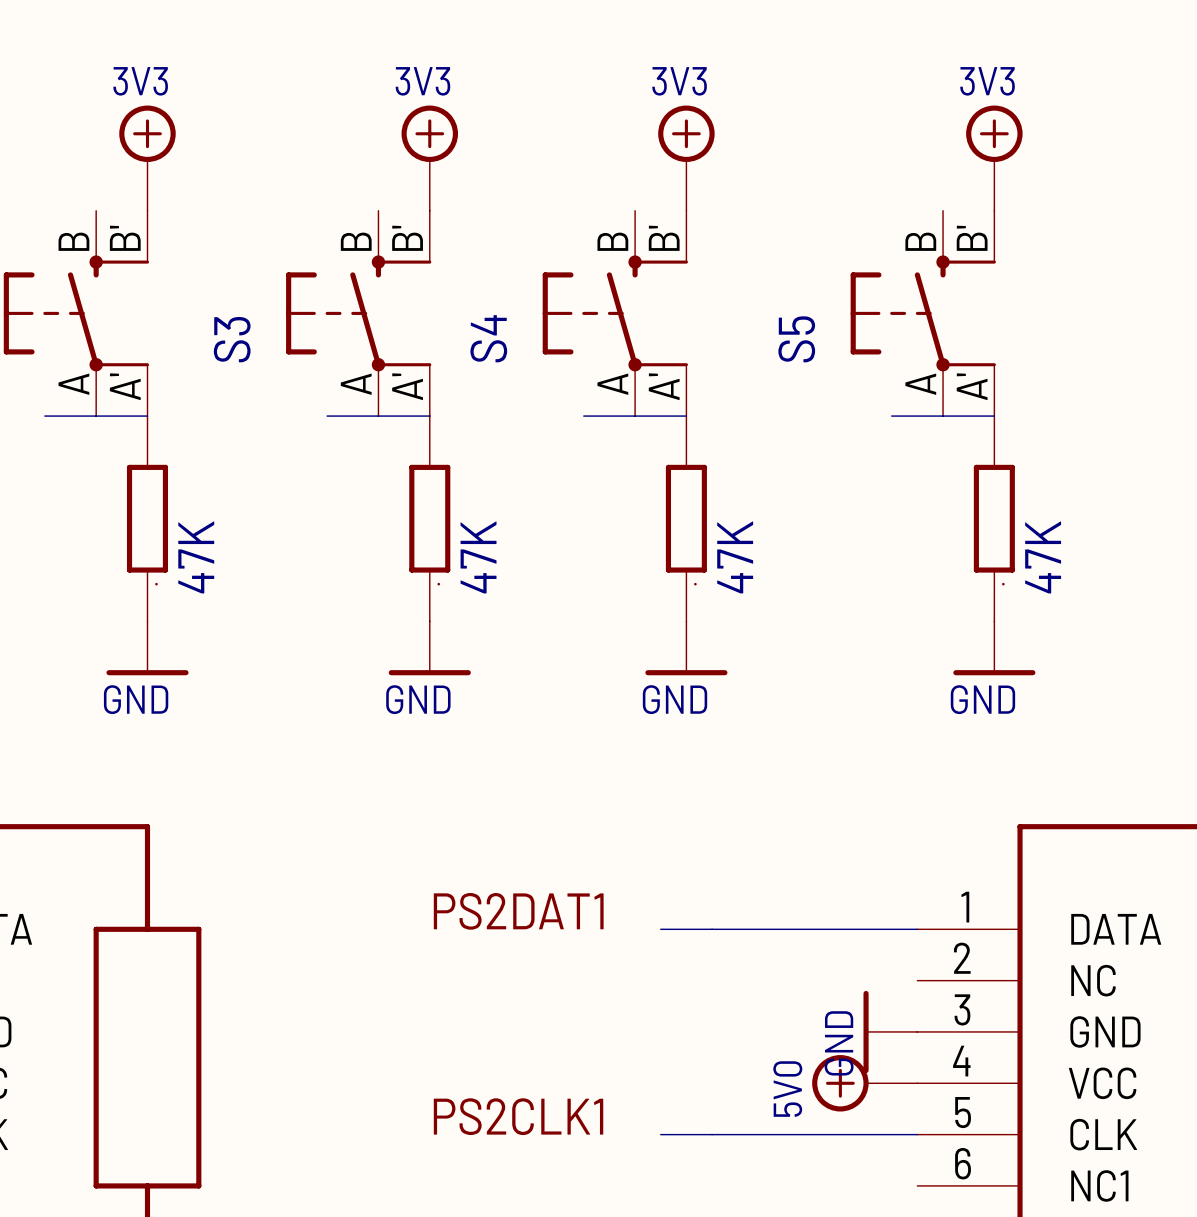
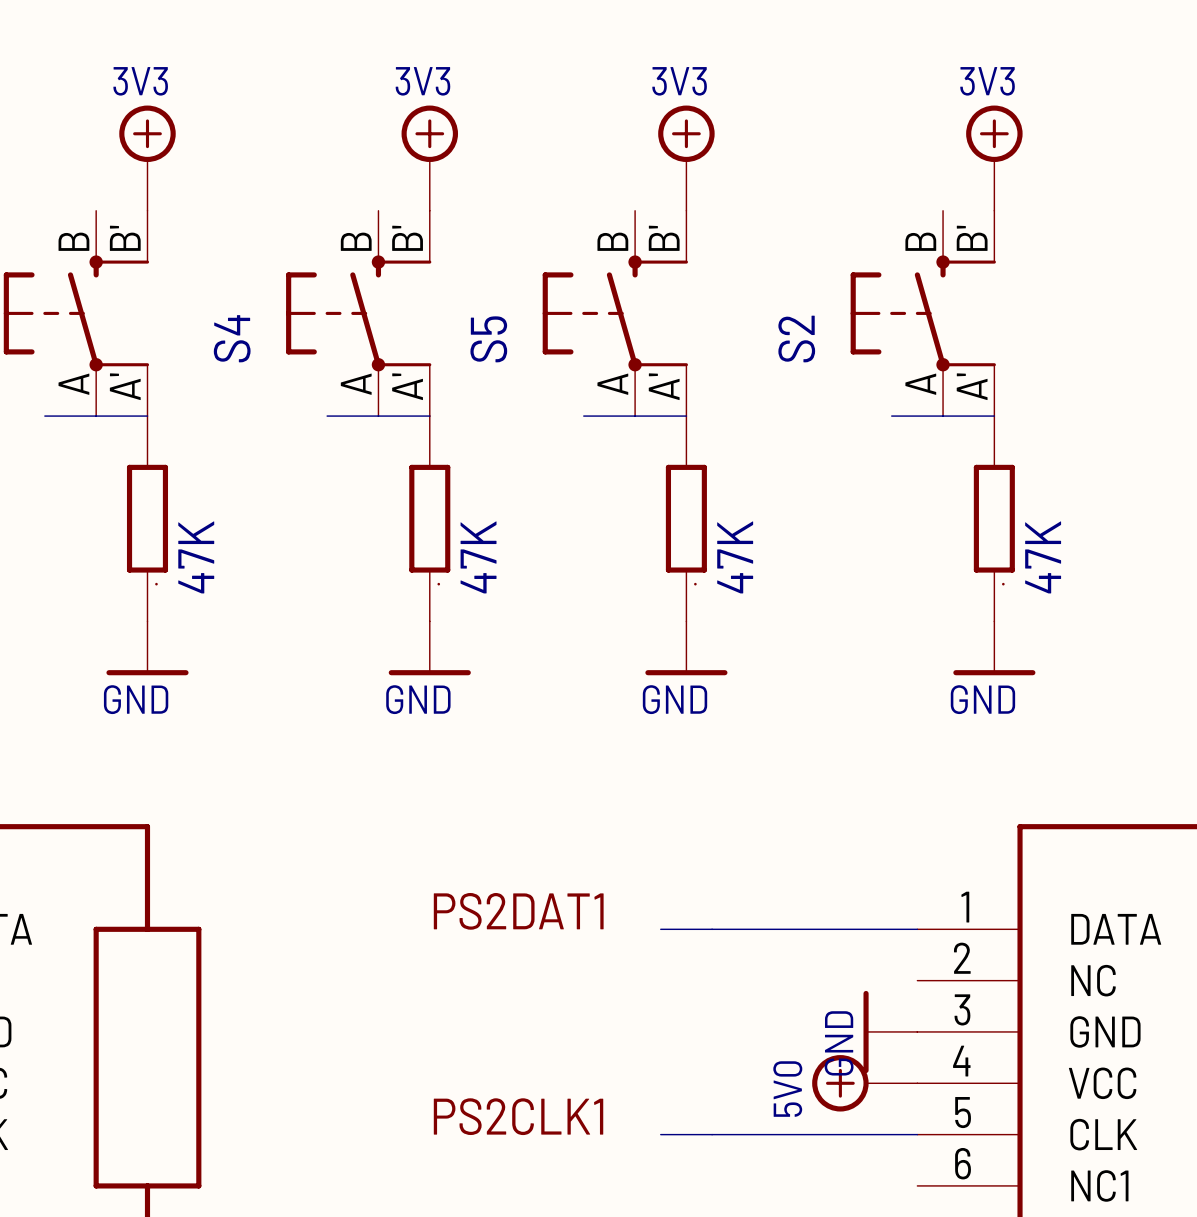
S4 name: S4 (488, 338) -> S5 (488, 339)
S3 name: S3 (232, 339) -> S4 (232, 338)
S5 name: S5 (796, 339) -> S2 (796, 339)

